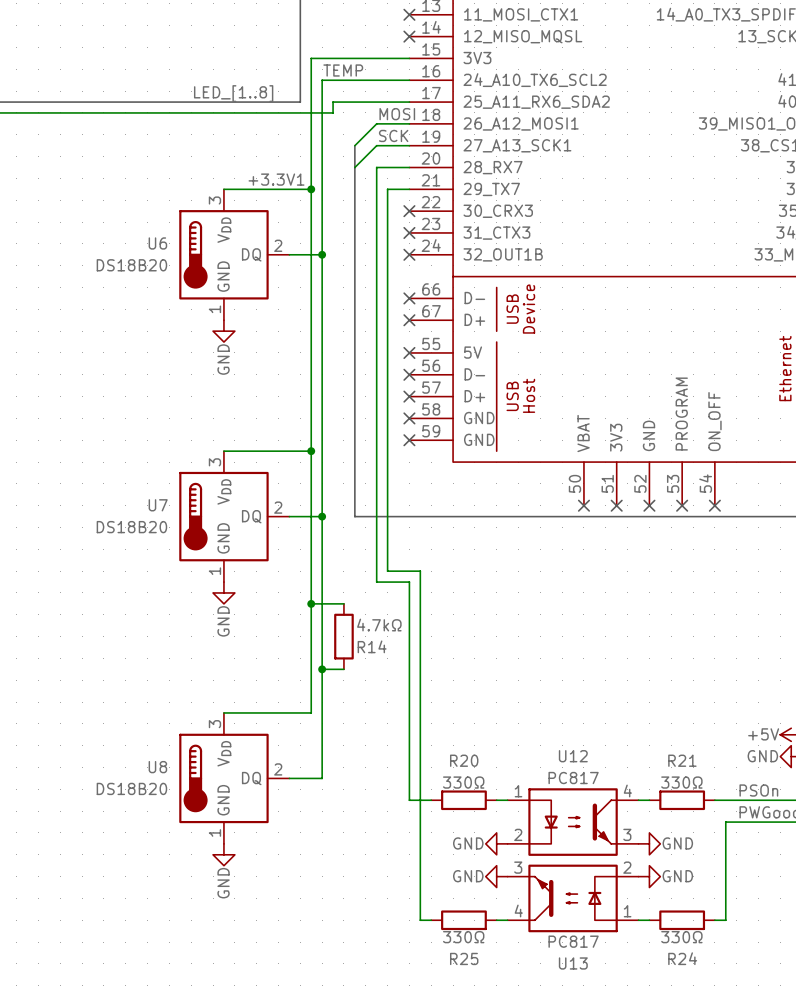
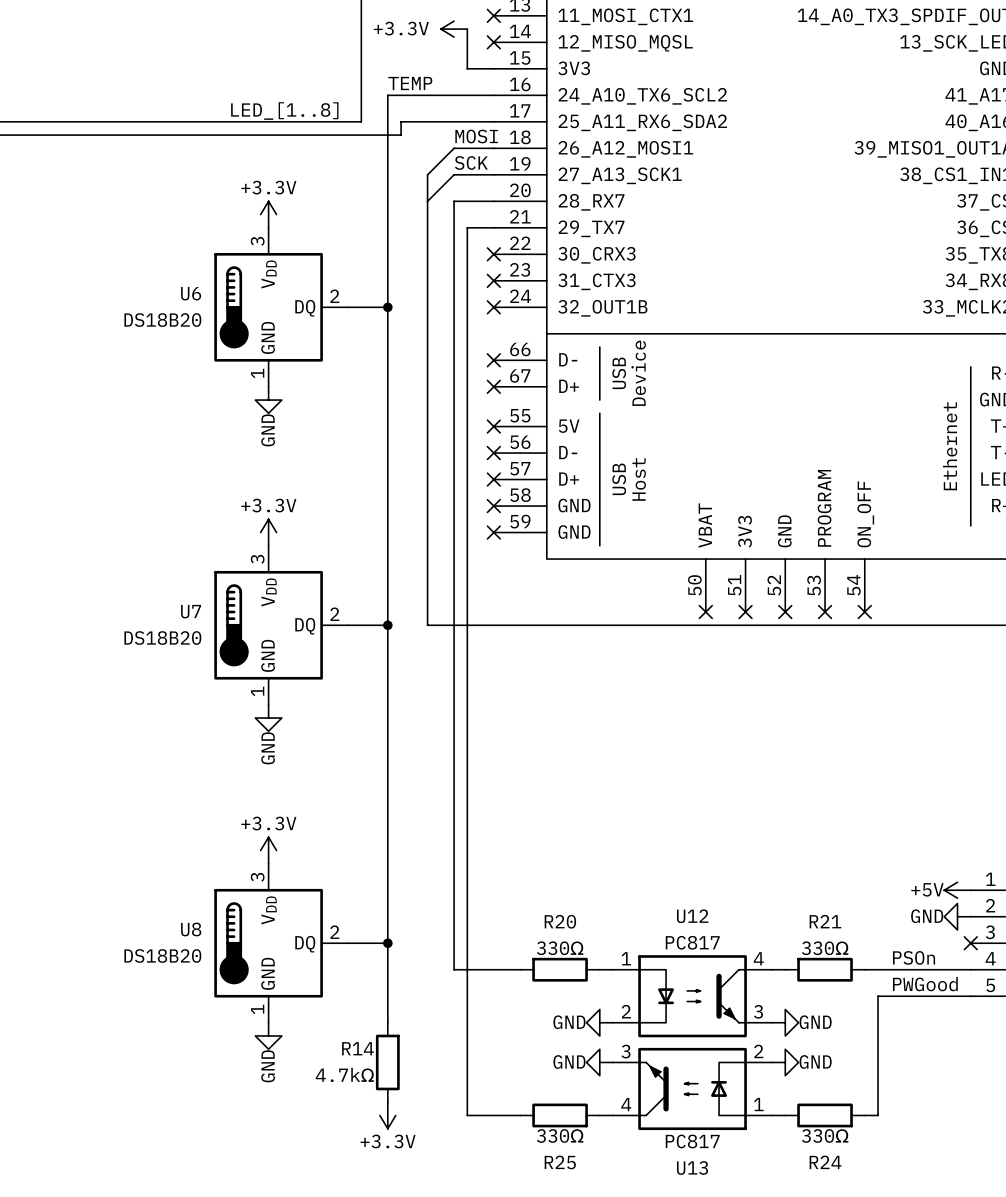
power symbol: none -> +3.3V (454, 29)
wire: (387, 58) (311, 58) (311, 712) (223, 712) -> (467, 68) (467, 29)
power symbol: none -> +3.3V (268, 214)
label: +3.3V1 (276, 179) -> none
wire: (223, 189) (311, 189) -> none
junction: (311, 189) -> none
power symbol: none -> +3.3V (268, 532)
wire: (223, 451) (311, 451) -> none
junction: (311, 451) -> none
wire: (387, 571) (420, 571) (420, 920) -> (467, 691) (467, 1115) (507, 1115)
wire: (376, 582) (409, 582) (409, 800) -> (454, 704) (454, 969) (493, 969)
wire: (311, 603) (343, 603) -> none
junction: (311, 603) -> none
R14 value position: 4.7kΩ (379, 625) -> 4.7kΩ (344, 1074)
R14 position: (343, 636) -> (387, 1062)
R14 name position: R14 (372, 646) -> R14 (357, 1048)
wire: (322, 669) (343, 669) -> none
junction: (322, 669) -> none
power symbol: none -> +3.3V (268, 850)
wire: none -> (387, 943) (387, 1022)
junction: none -> (387, 943)
power symbol: none -> +3.3V (387, 1115)

